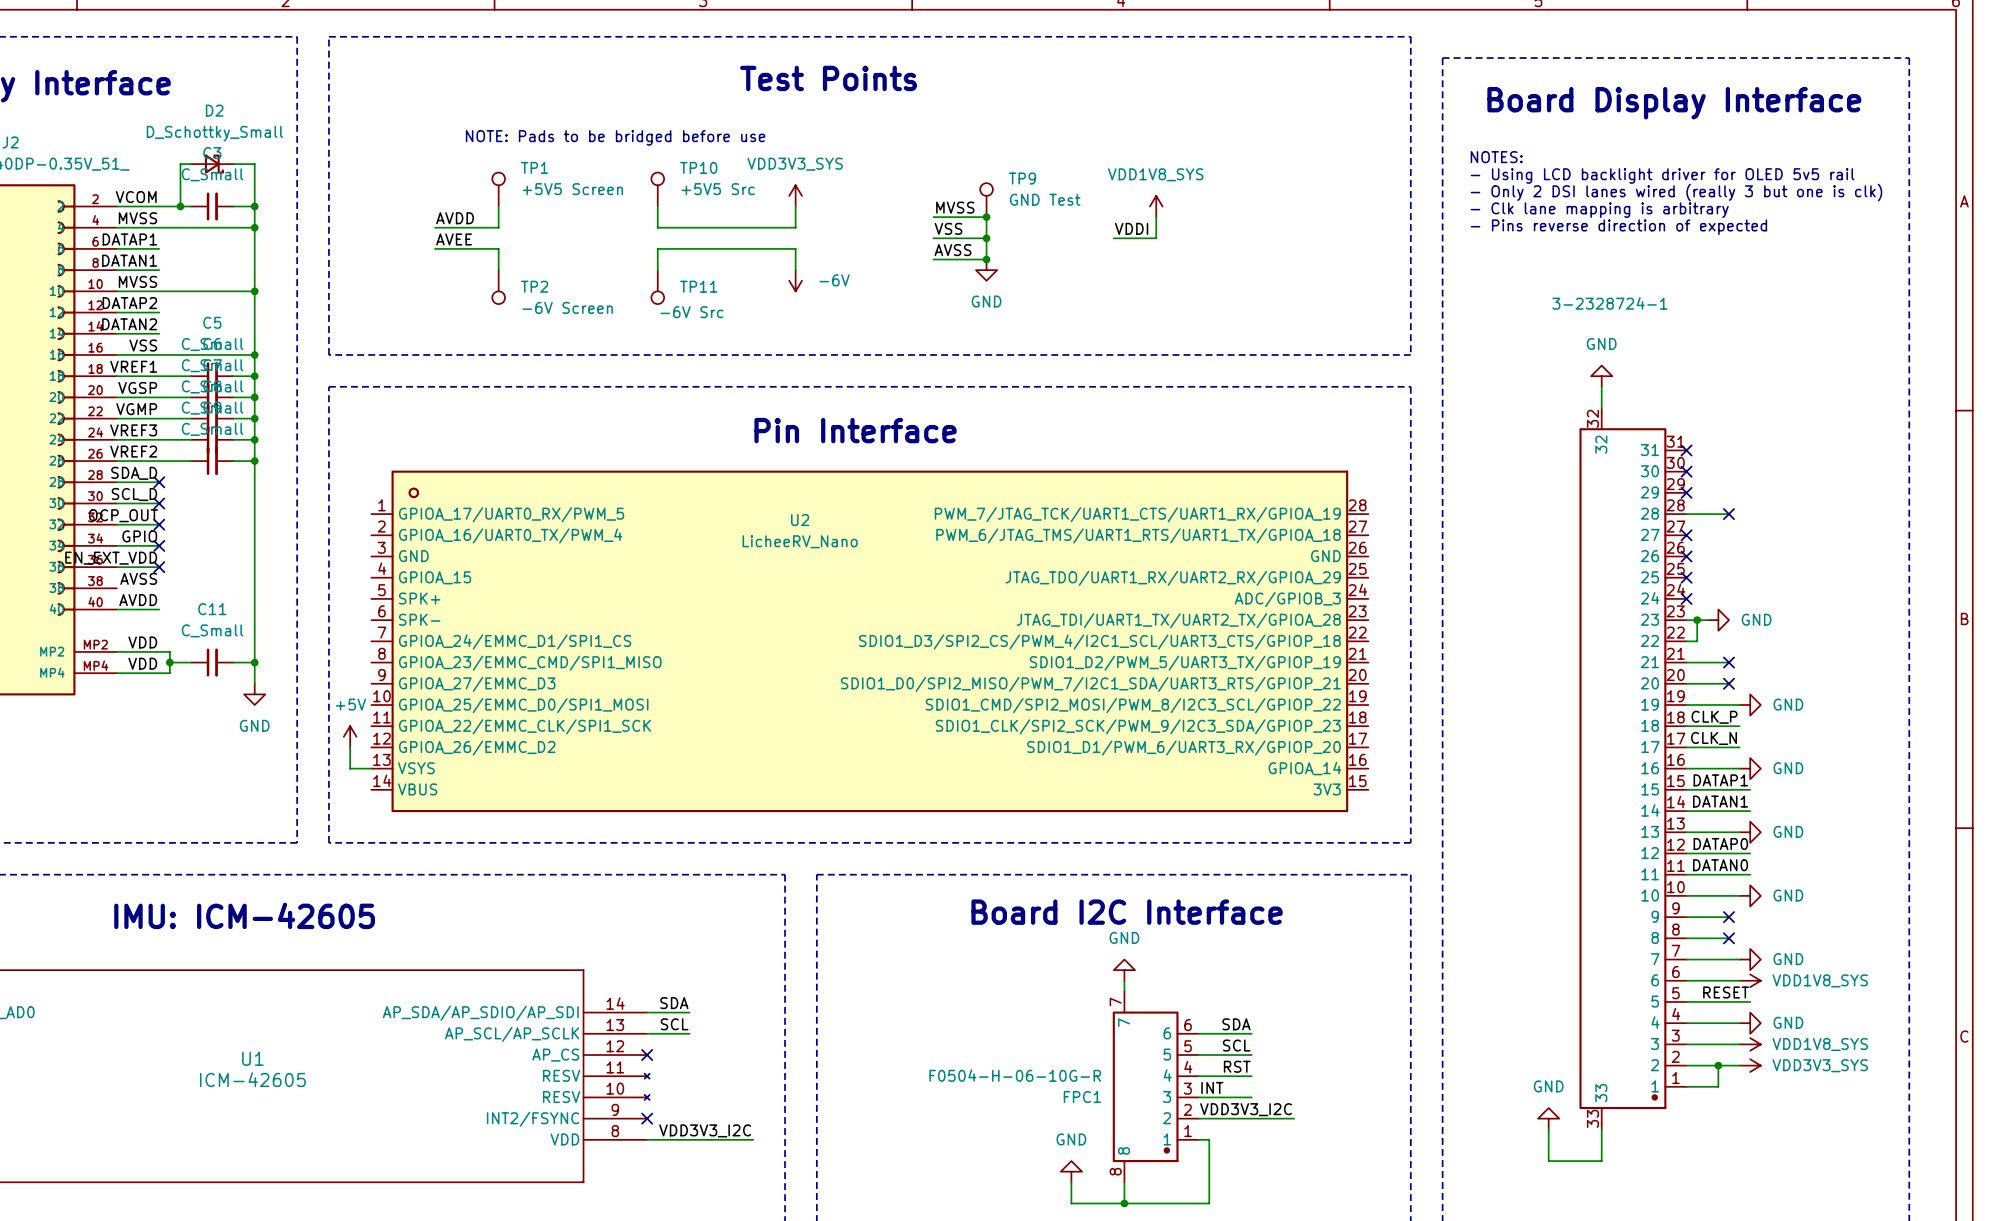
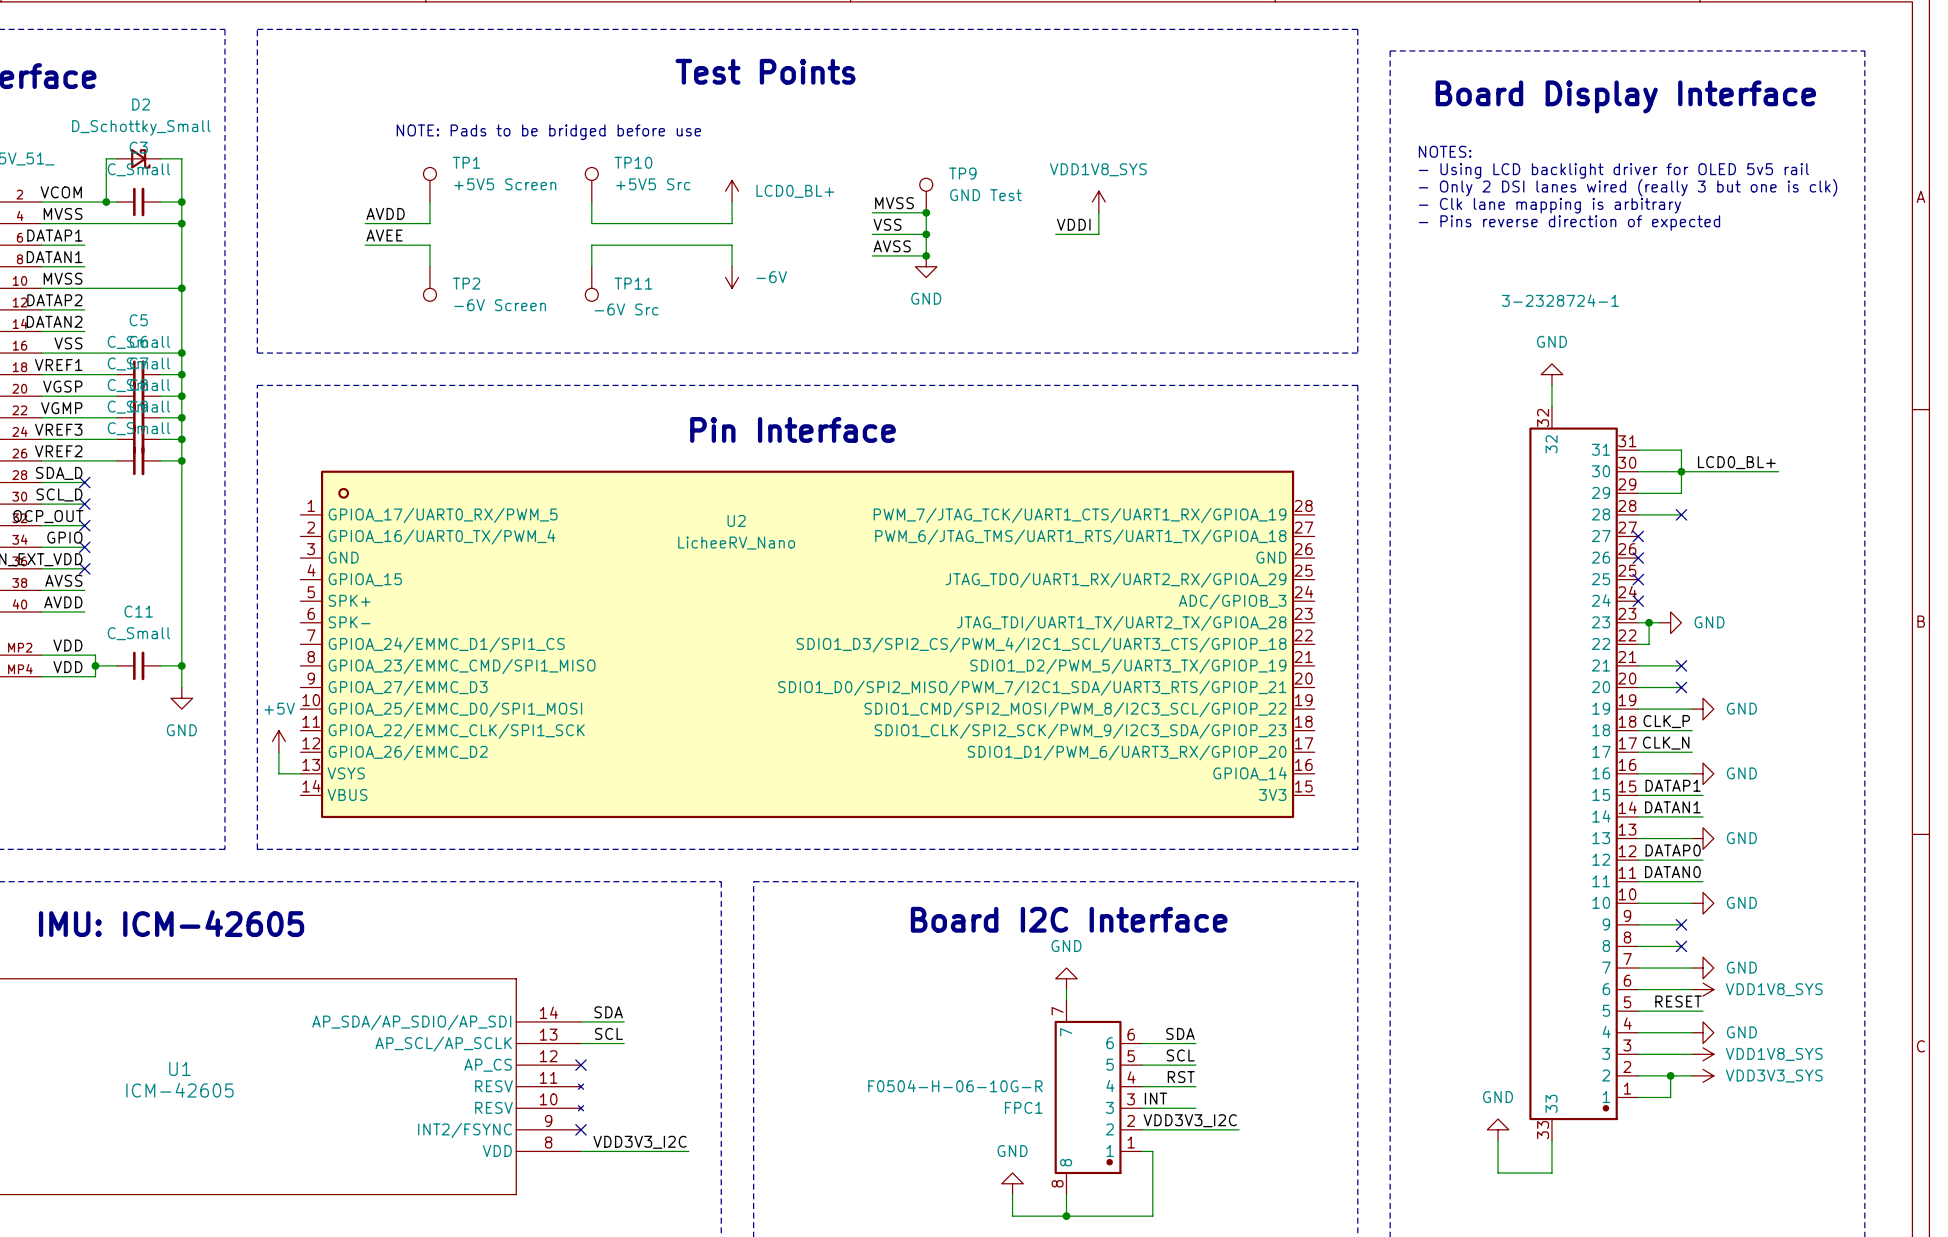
power symbol: VDD3V3_SYS (795, 195) -> LCD0_BL+ (732, 191)
wire: none -> (1638, 450) (1681, 450) (1681, 493) (1638, 493)
no-connect mark: (1686, 450) -> none
label: none -> LCD0_BL+ (1736, 462)
wire: none -> (1638, 471) (1778, 471)
no-connect mark: (1686, 471) -> none
junction: none -> (1681, 471)
no-connect mark: (1686, 492) -> none
wire: none -> (41, 590) (84, 590)

